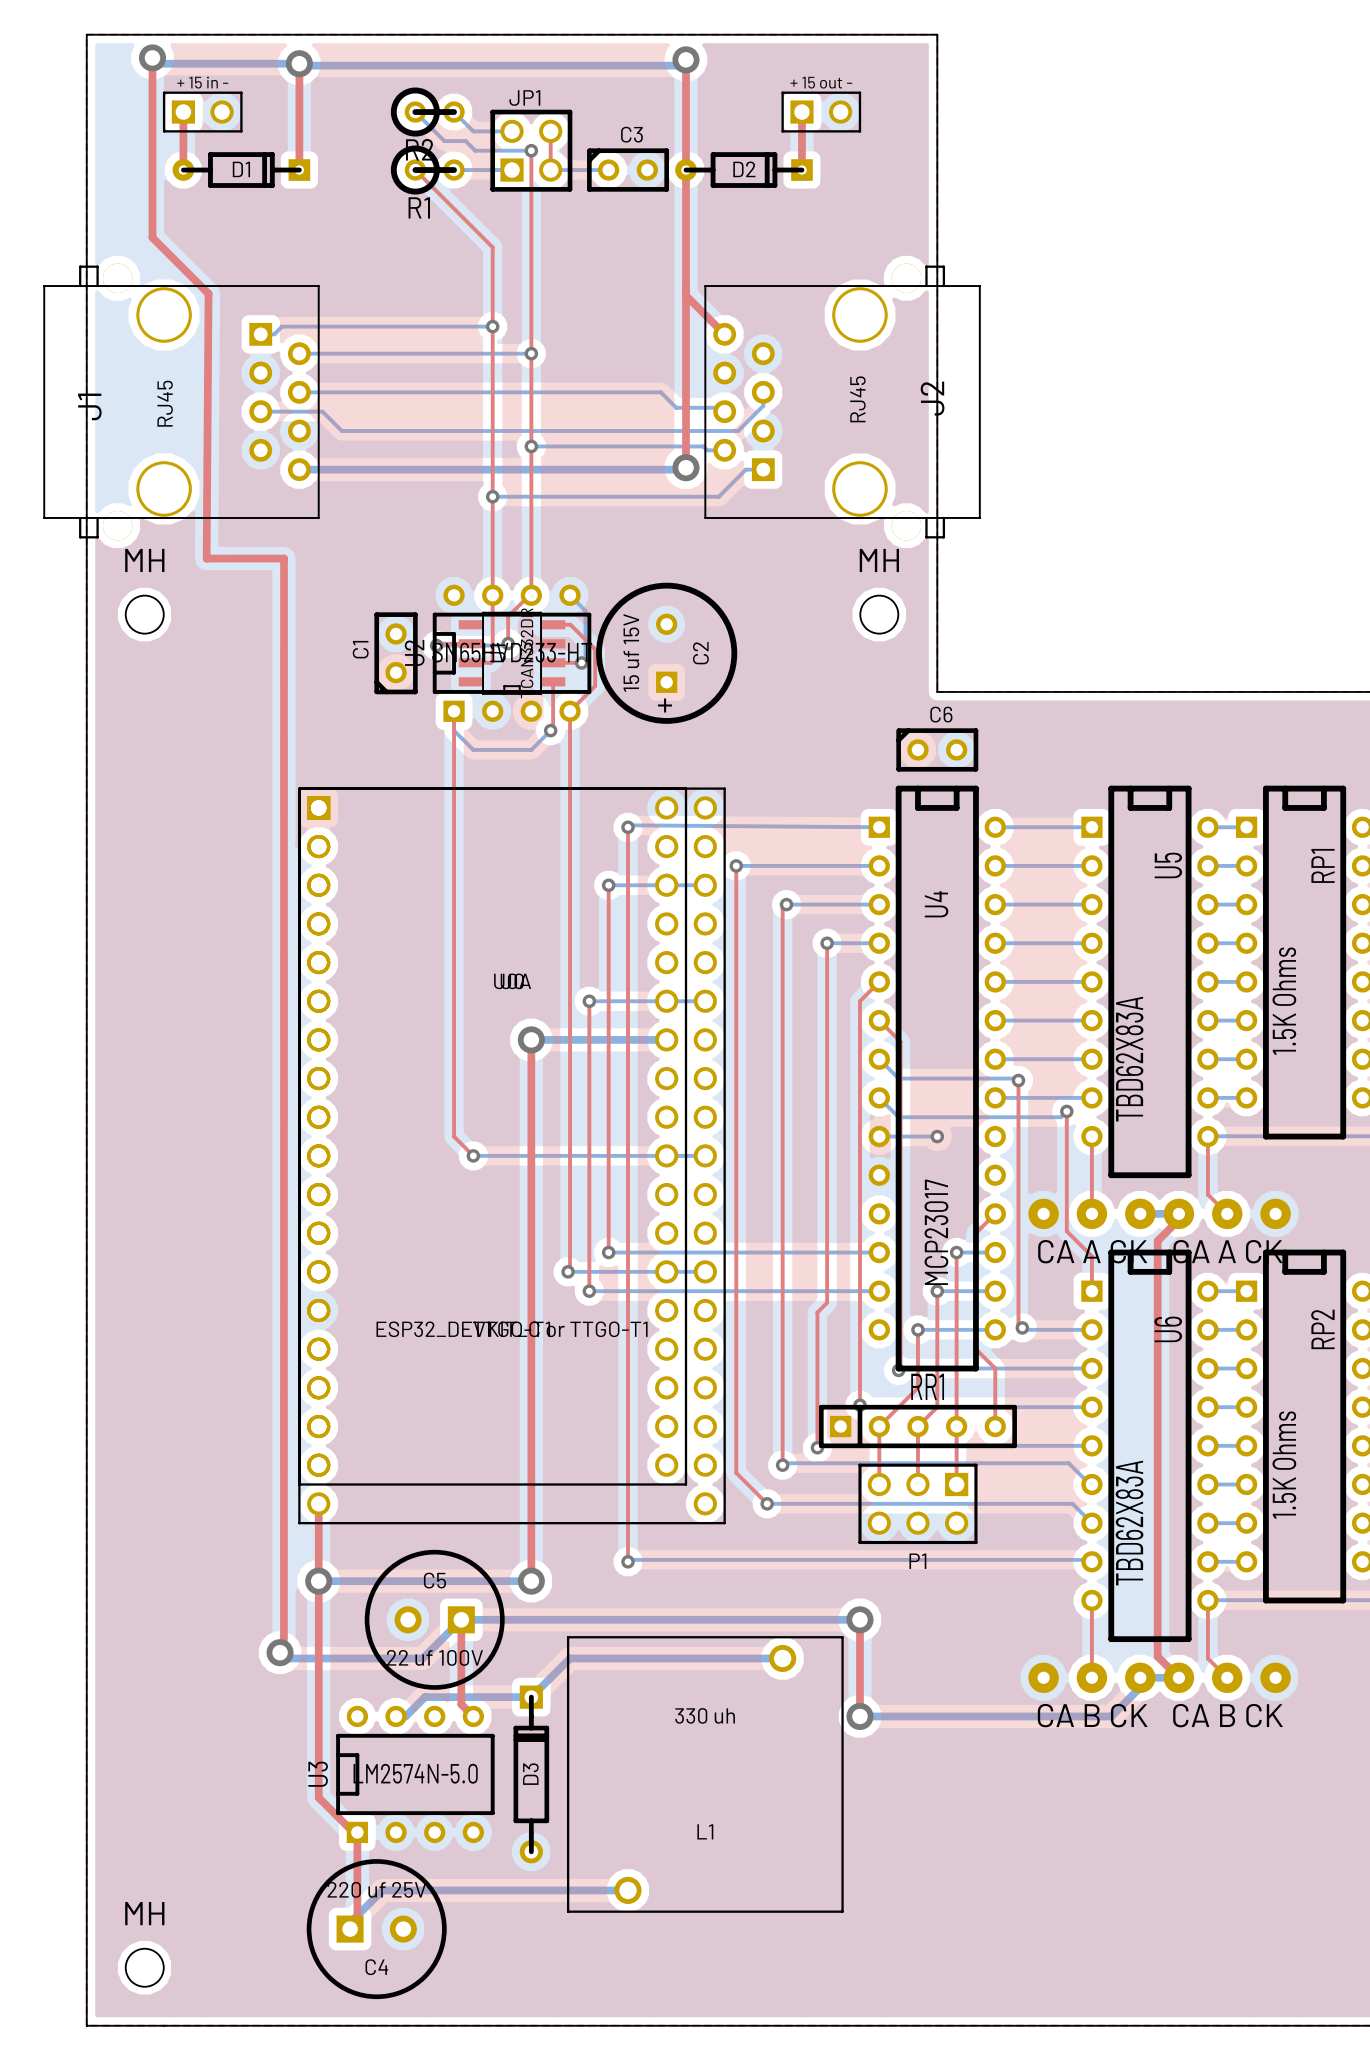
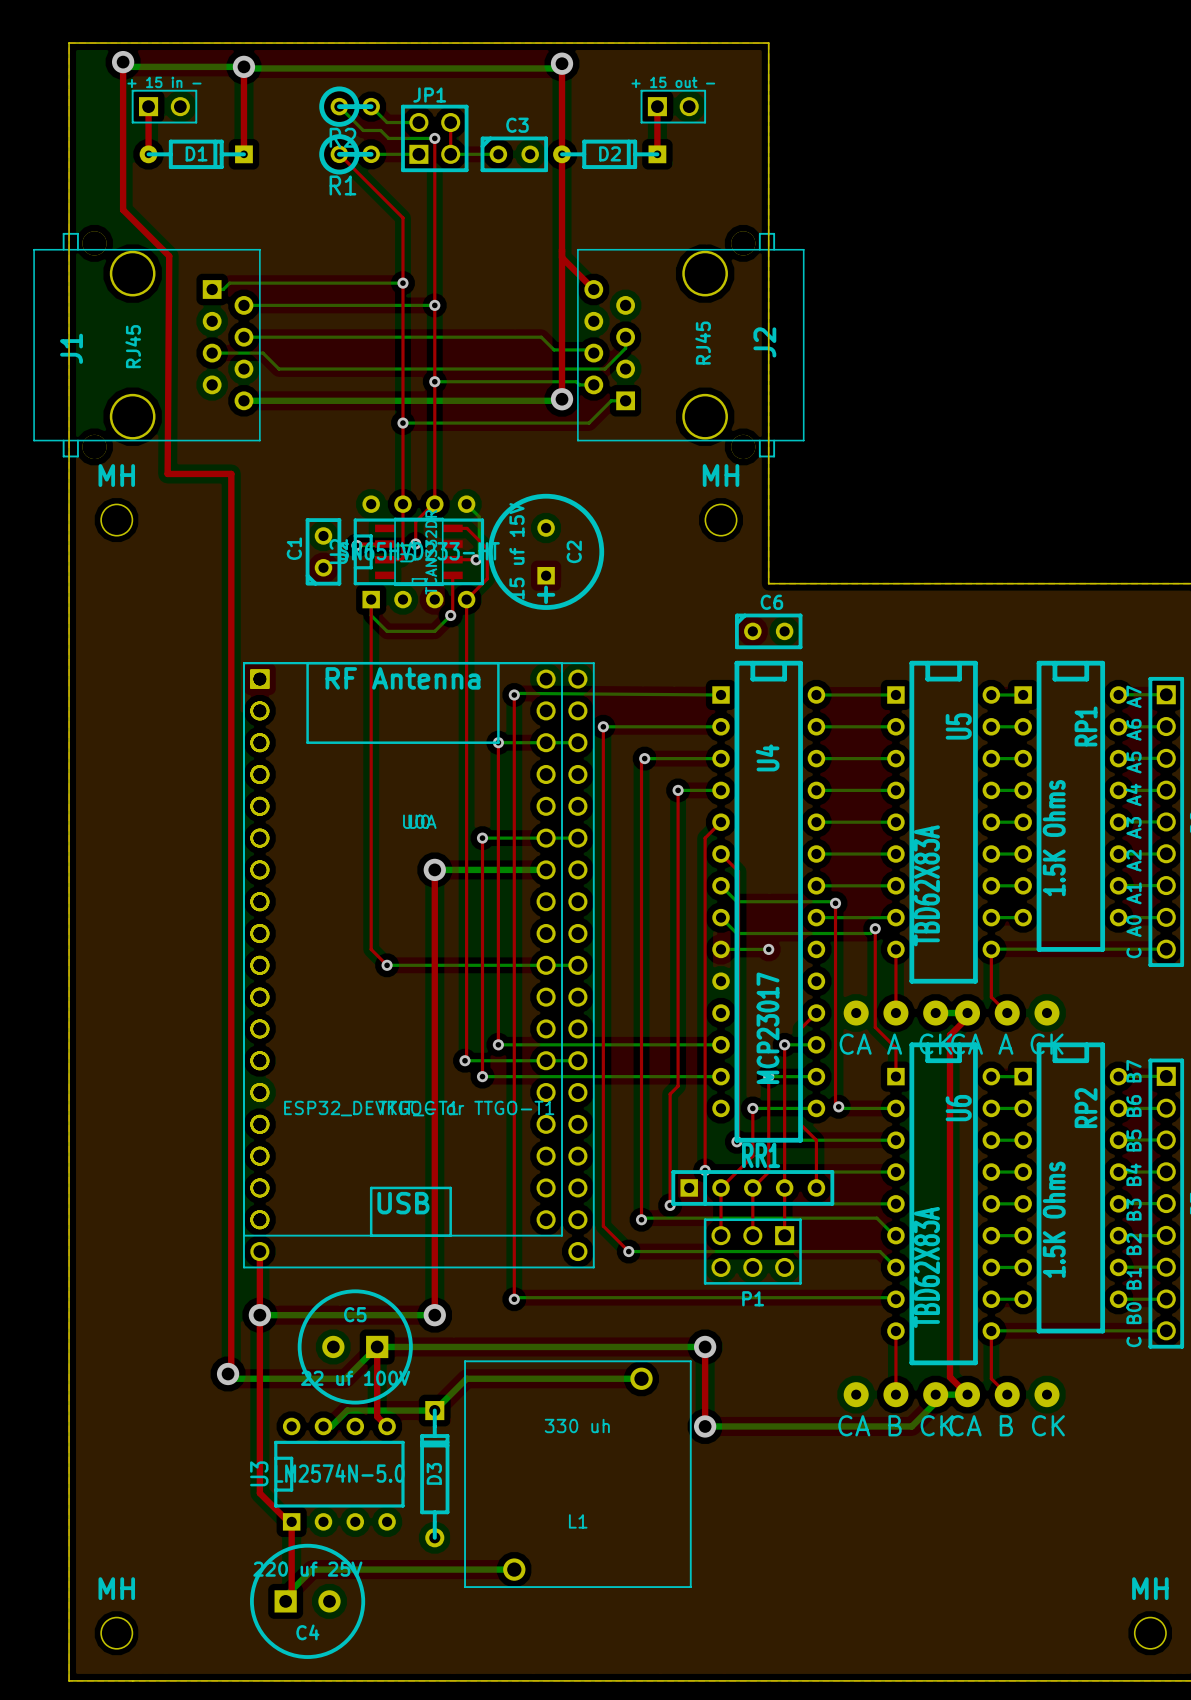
line: none -> (307, 663) (498, 663) (498, 742) (307, 742) (307, 663)
text: none -> RF Antenna (402, 678)
line: none -> (371, 1187) (450, 1187) (450, 1235) (371, 1235) (371, 1187)
text: none -> USB (403, 1203)

